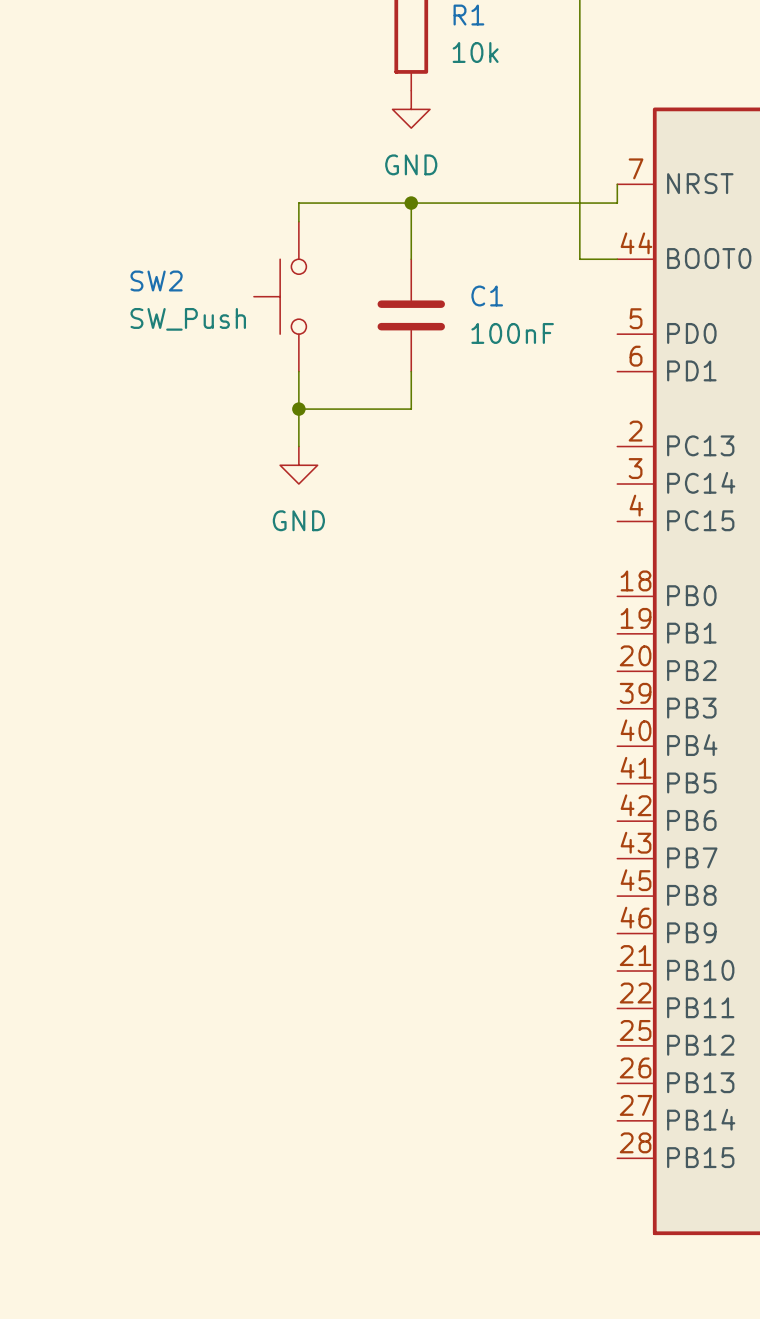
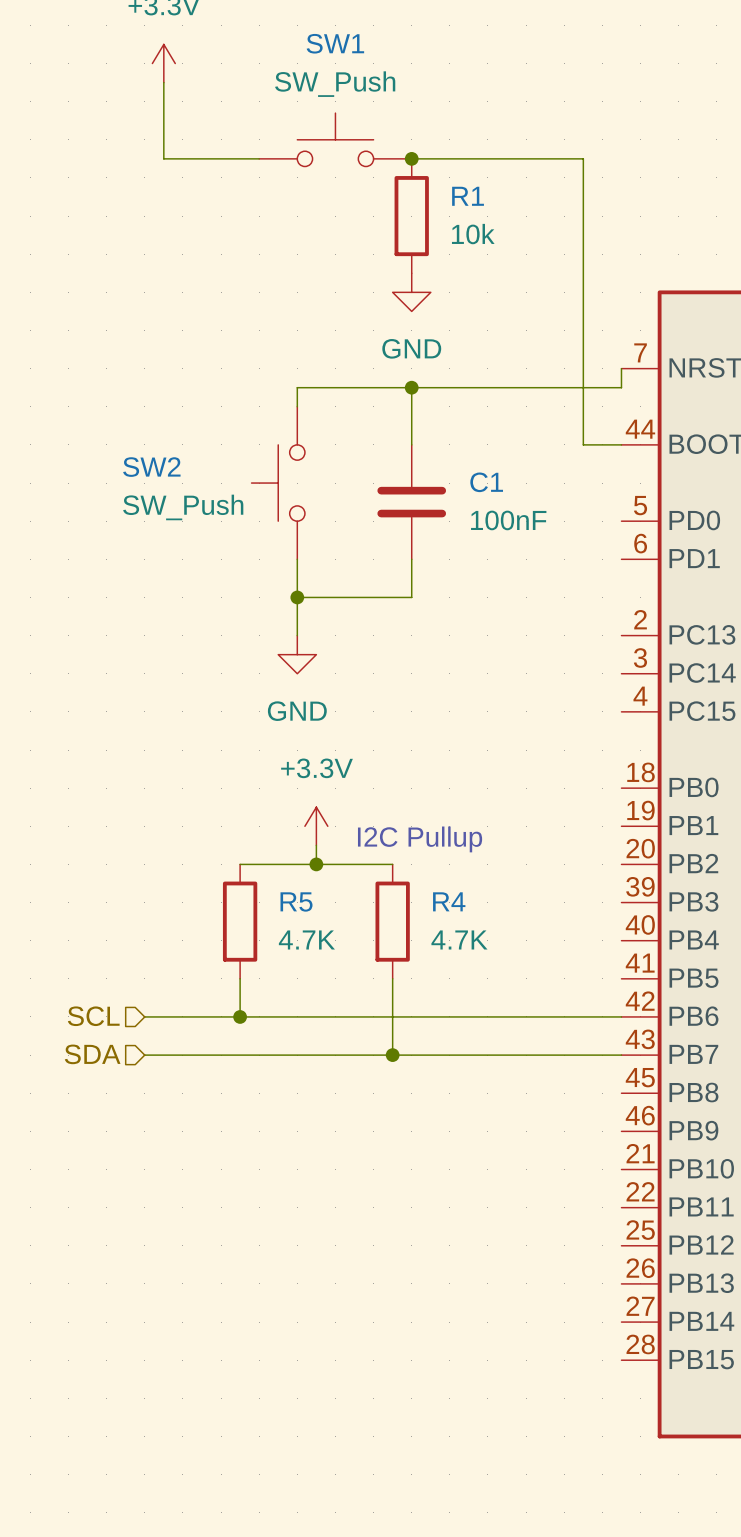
power symbol: none -> +3.3V (316, 826)
text: none -> I2C Pullup (420, 839)
wire: none -> (316, 845) (316, 864)
wire: none -> (240, 864) (392, 864)
junction: none -> (316, 864)
R5: none -> 4.7K (240, 921)
R4: none -> 4.7K (392, 921)
wire: none -> (240, 978) (240, 1016)
wire: none -> (392, 978) (392, 1055)
hierarchical label: none -> SCL (93, 1016)
wire: none -> (144, 1016) (621, 1016)
junction: none -> (240, 1016)
hierarchical label: none -> SDA (92, 1054)
wire: none -> (144, 1055) (621, 1055)
junction: none -> (392, 1055)

